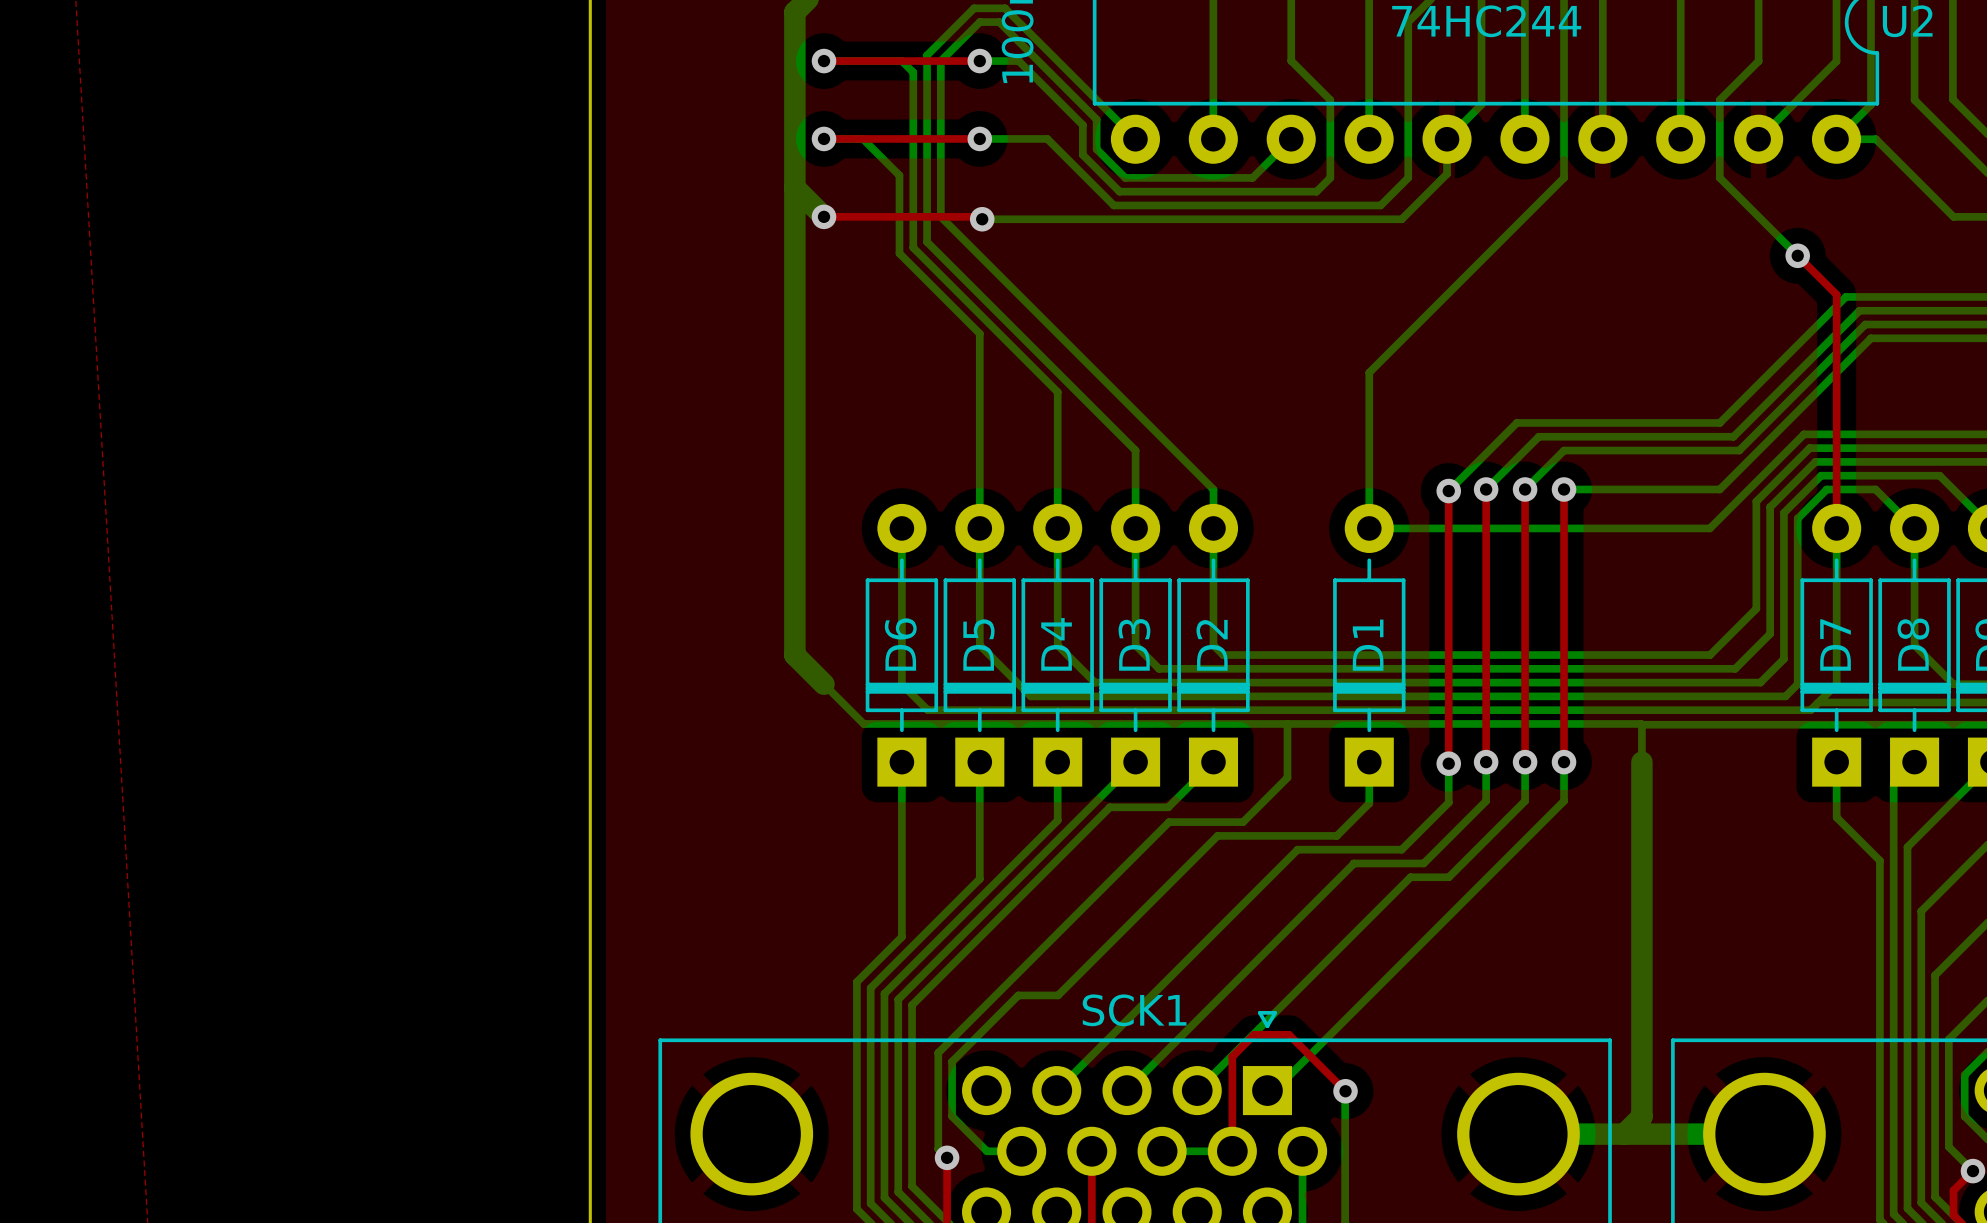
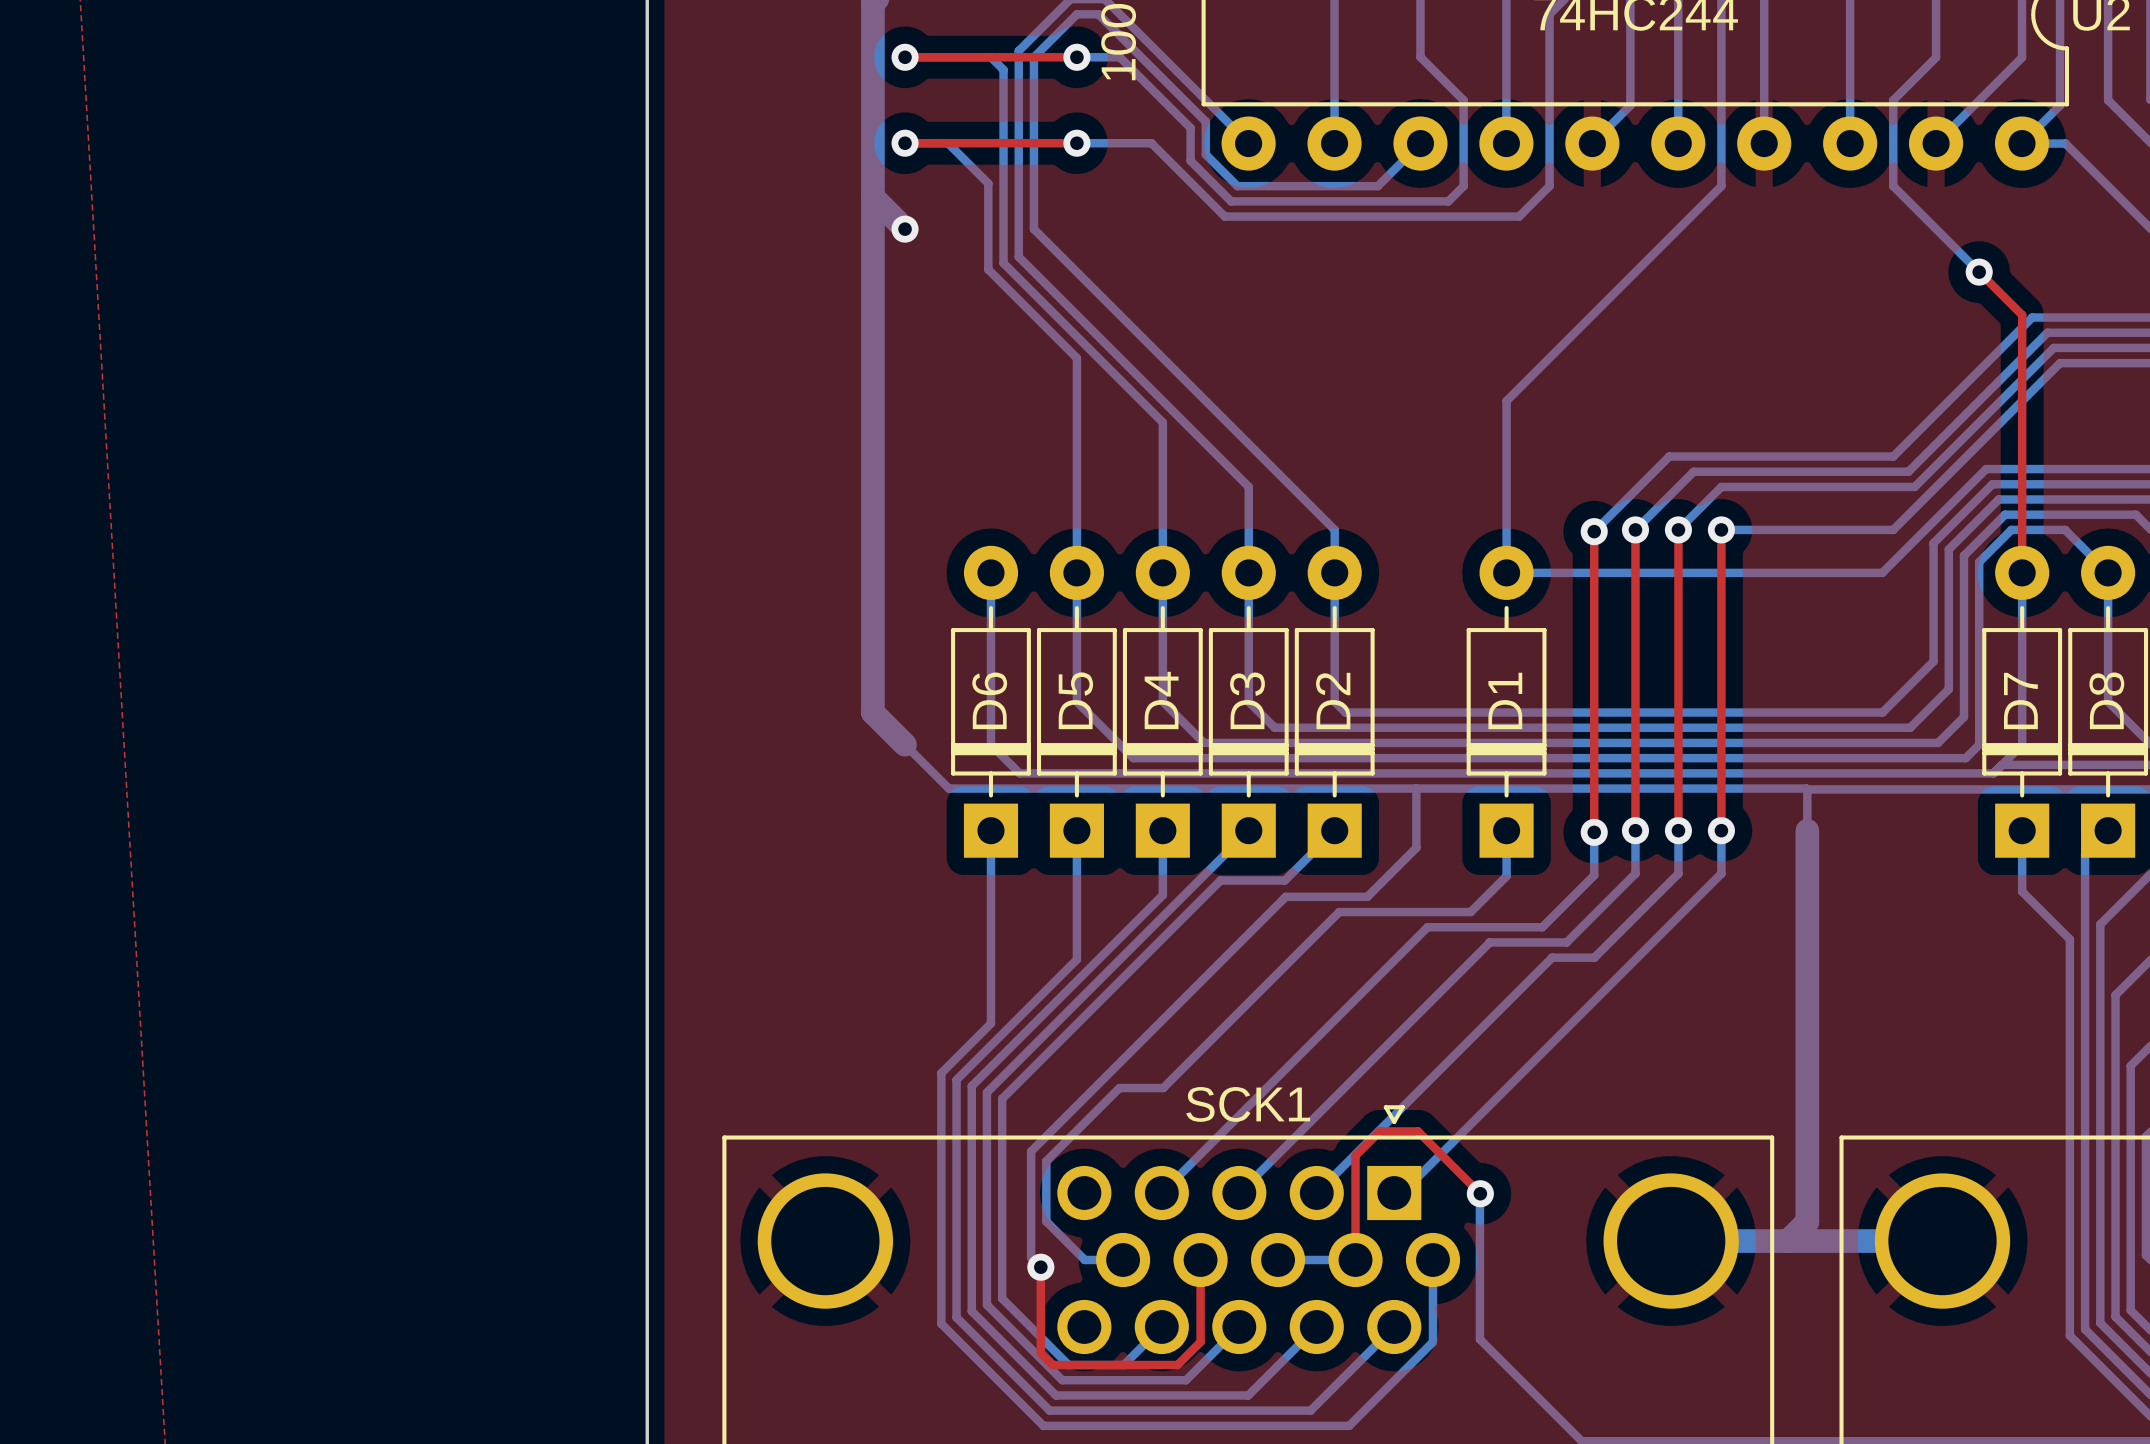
bottom track: (1447, 139) (1447, 173) (1401, 219) (982, 219) -> none
top track: (824, 216) (979, 216) (982, 219) -> none
via: (982, 219) -> none

